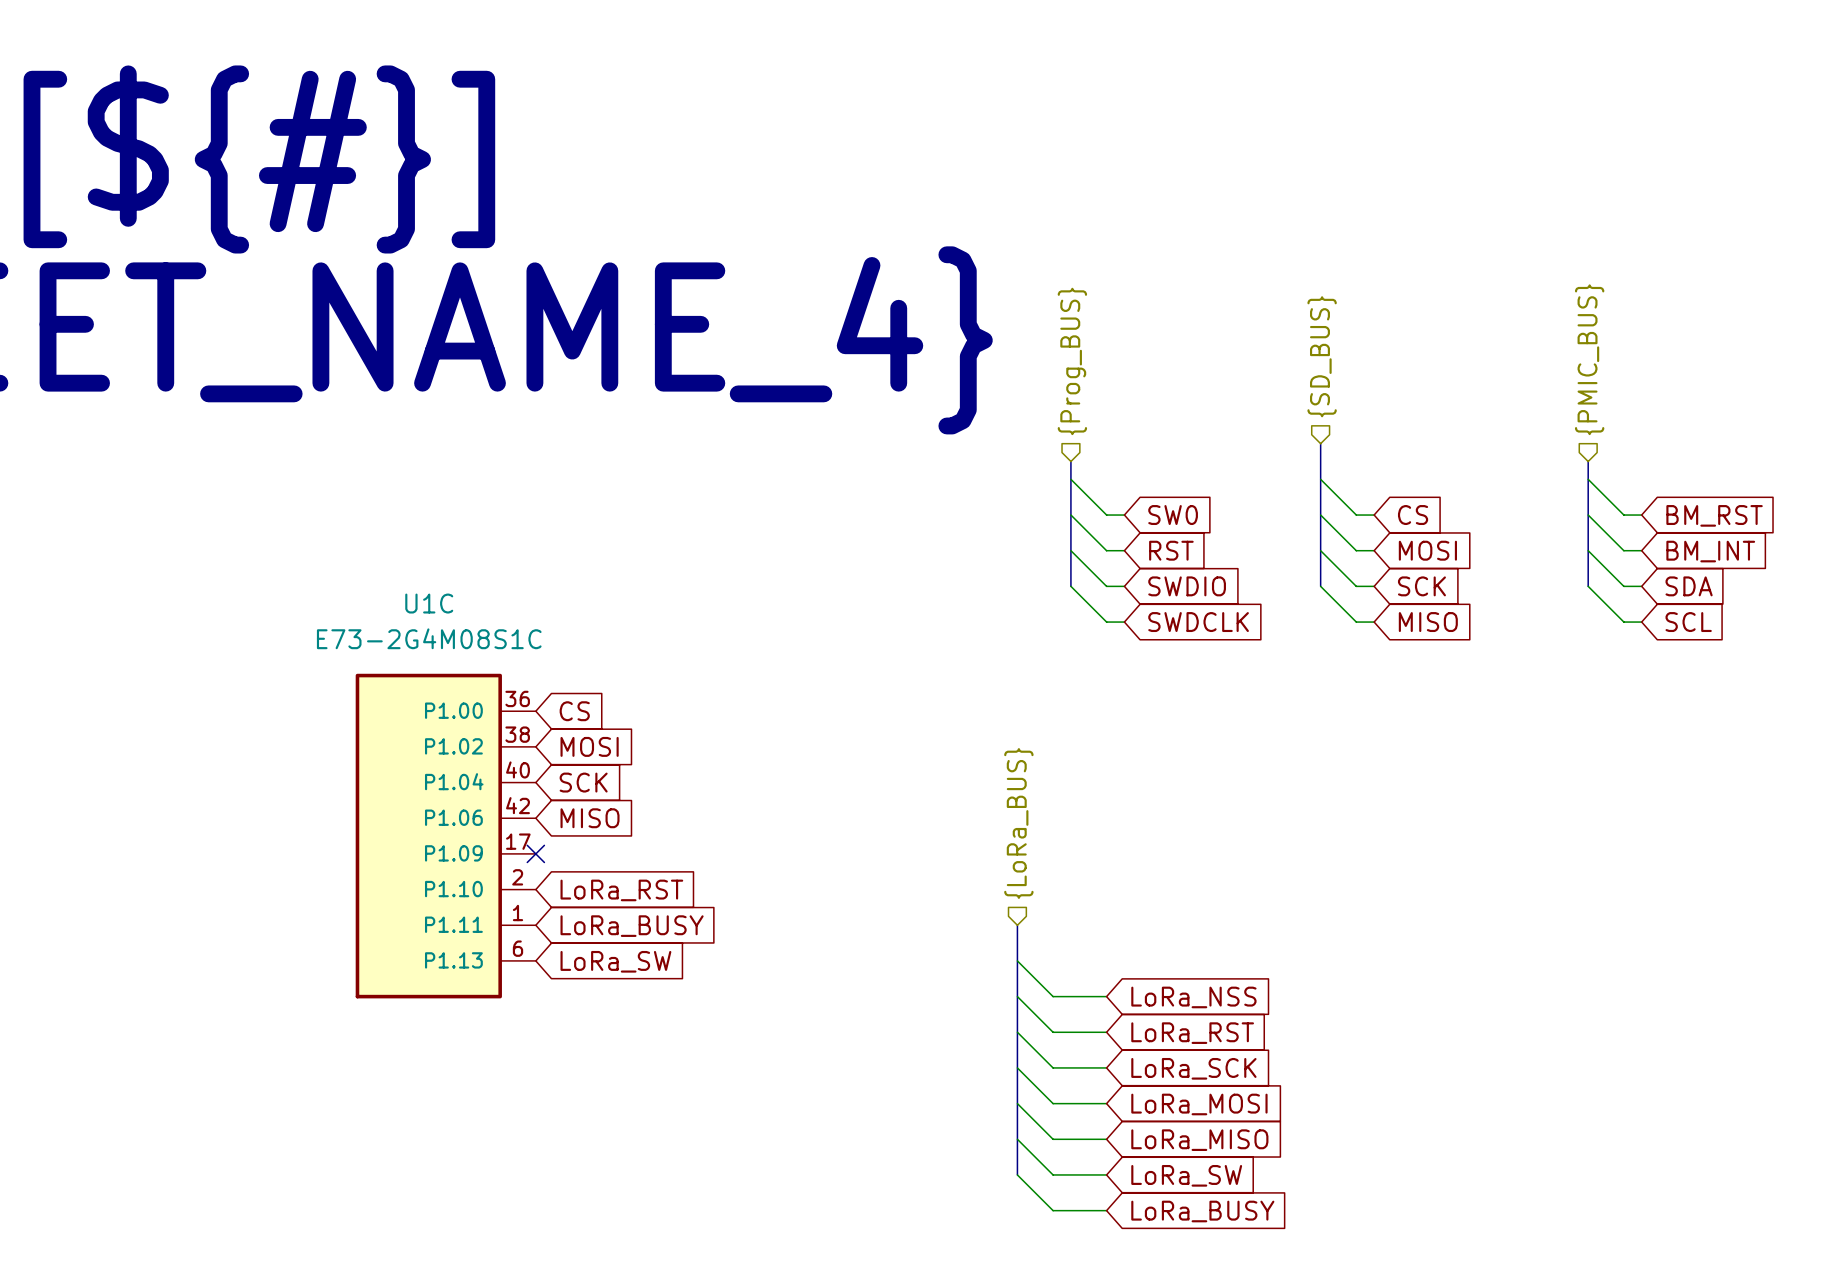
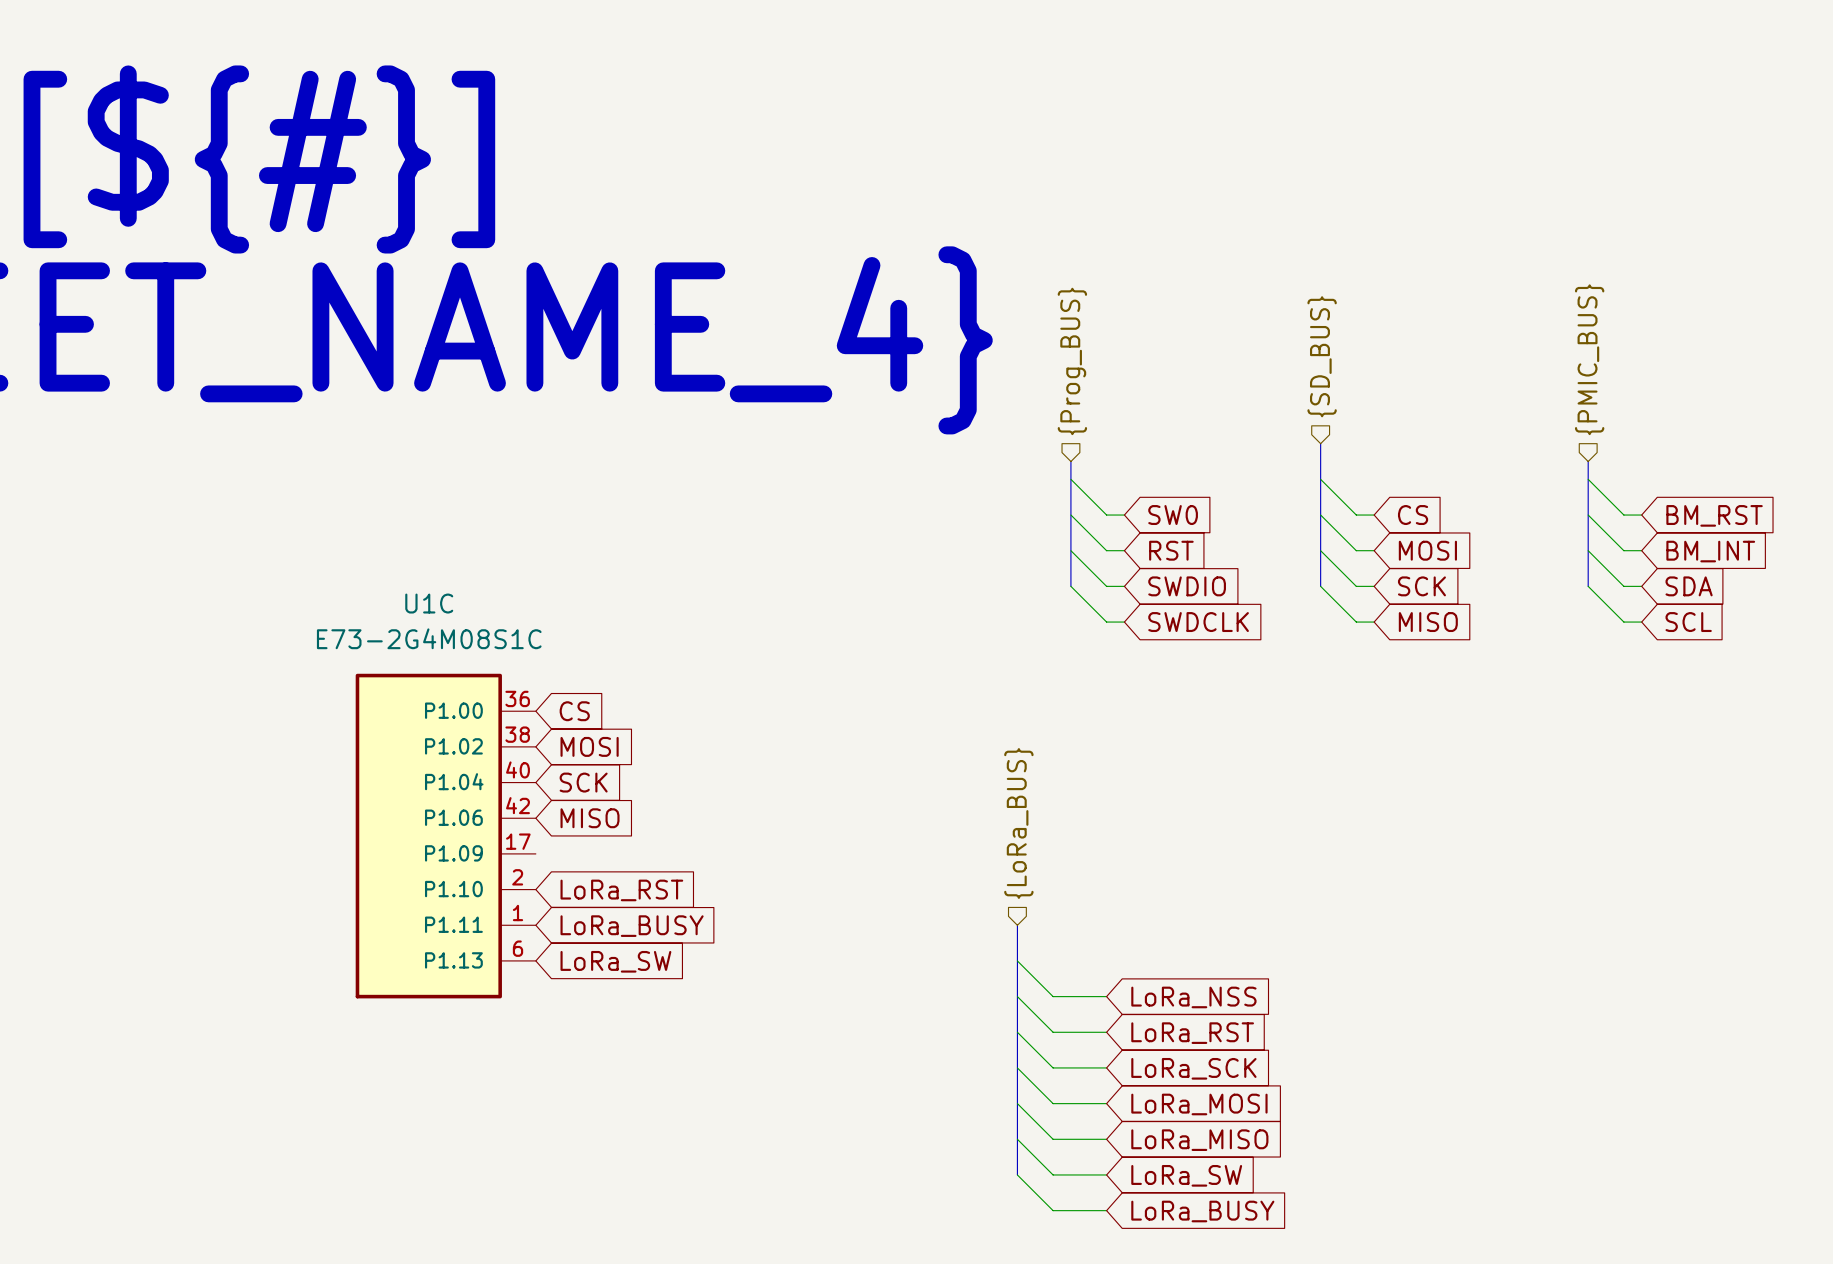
no-connect mark: (535, 853) -> none

